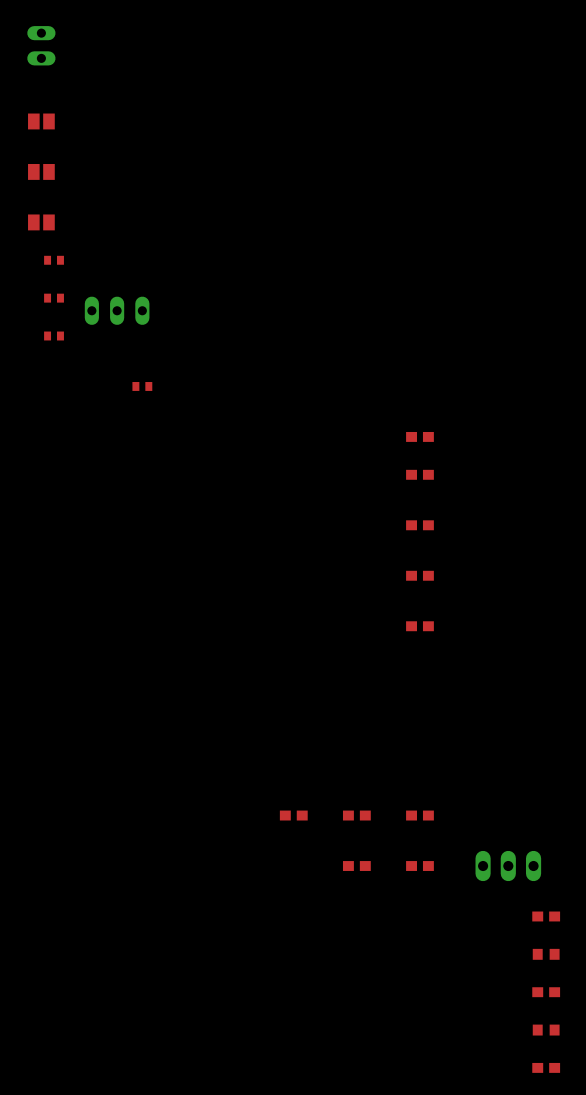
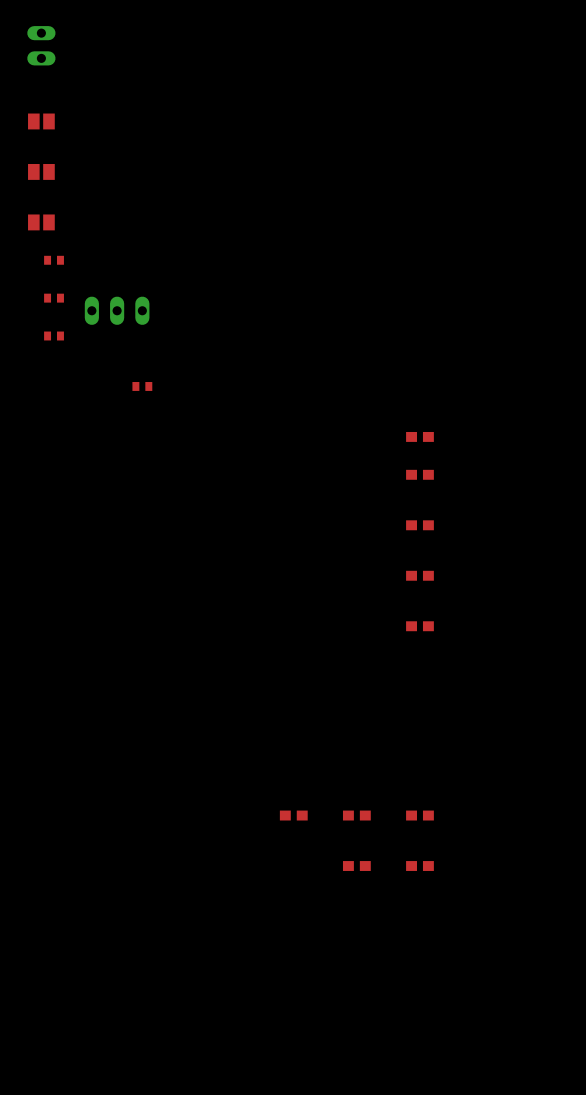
part: (508, 866) -> none
part: (546, 916) -> none
part: (546, 954) -> none
part: (546, 992) -> none
part: (546, 1030) -> none
part: (546, 1067) -> none

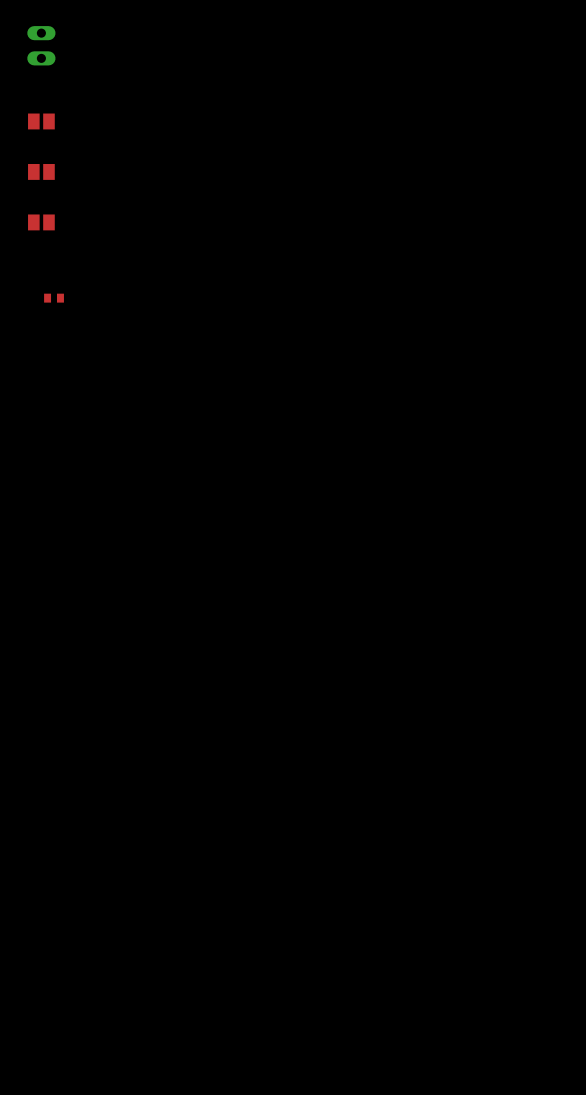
part: (54, 260) -> none
part: (117, 310) -> none
part: (54, 336) -> none
part: (142, 386) -> none
part: (419, 436) -> none
part: (419, 474) -> none
part: (419, 525) -> none
part: (419, 575) -> none
part: (419, 626) -> none
part: (293, 815) -> none
part: (356, 815) -> none
part: (419, 815) -> none
part: (356, 866) -> none
part: (419, 866) -> none

